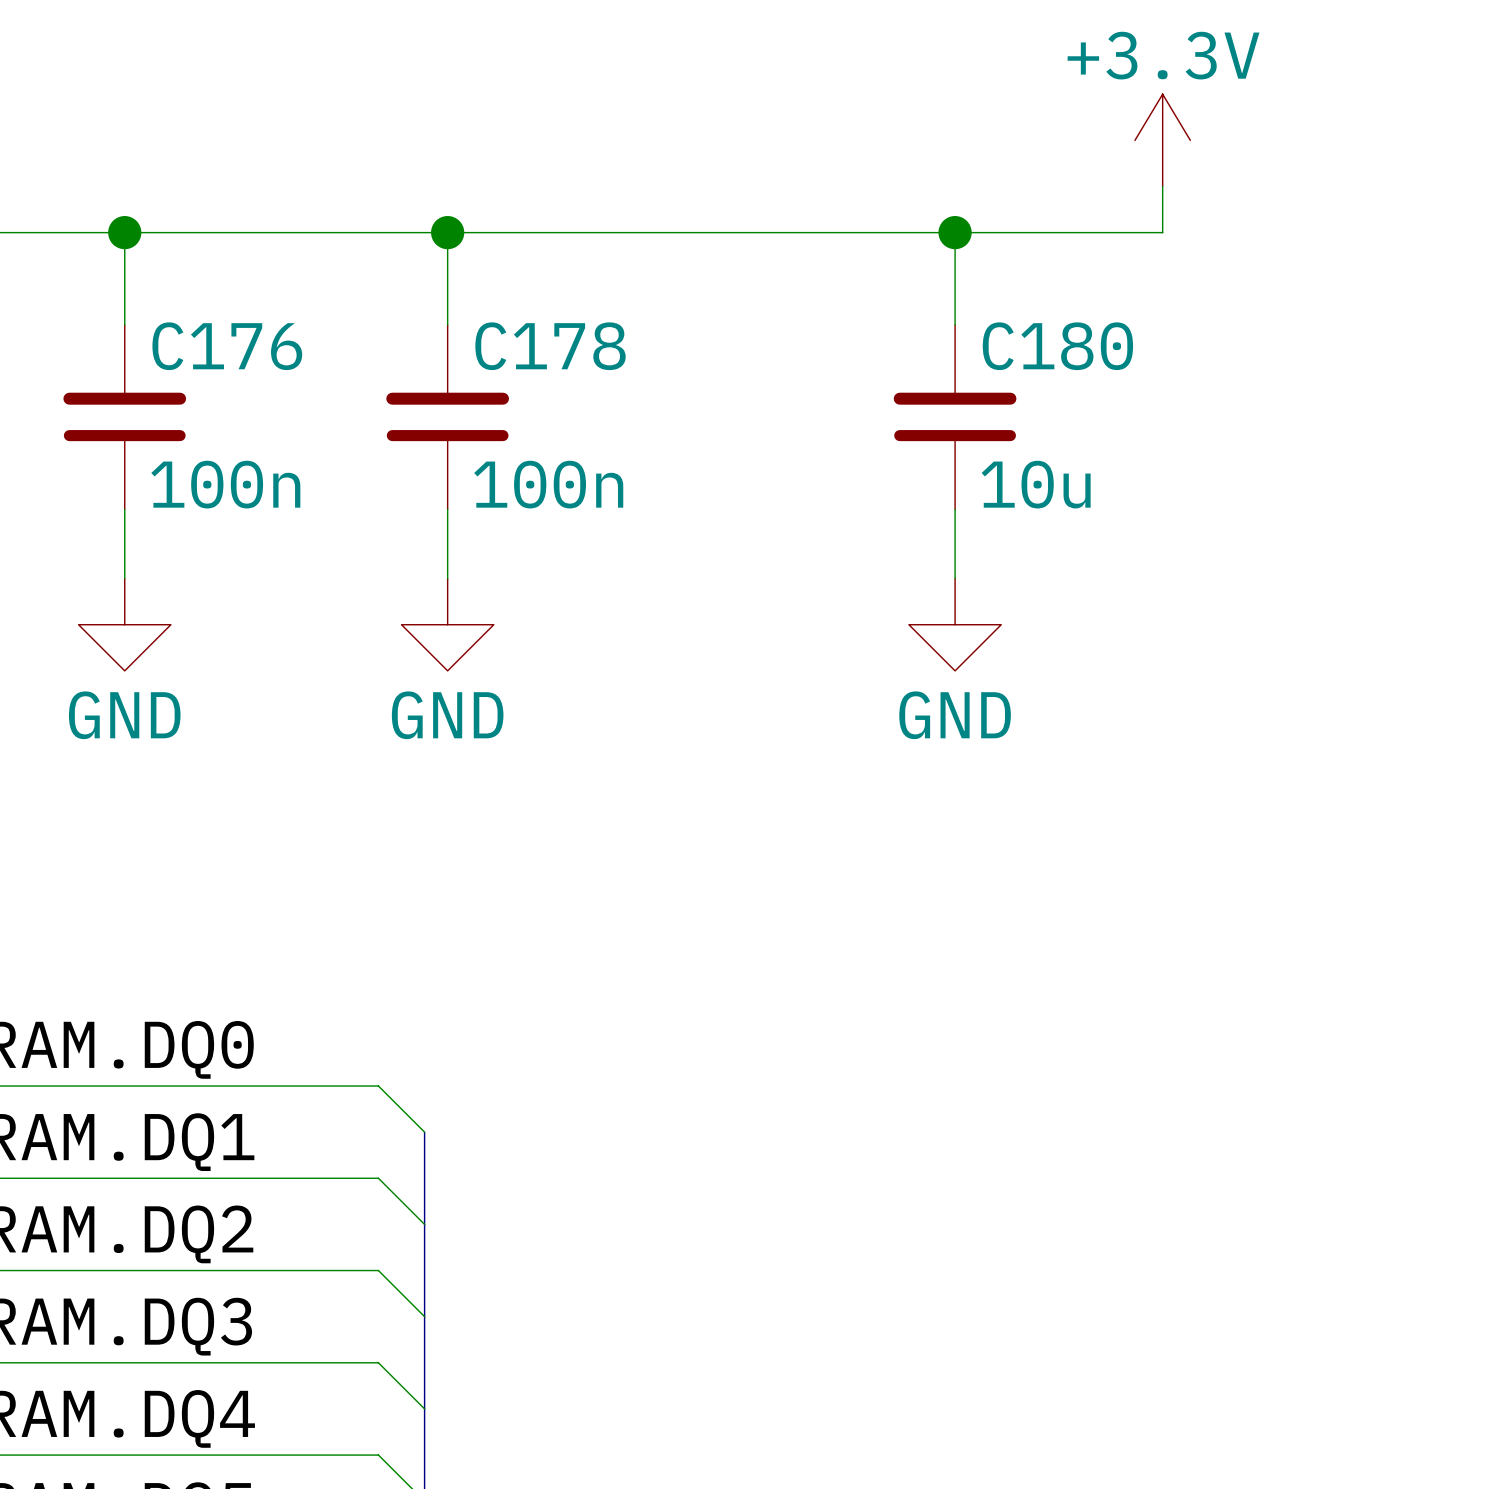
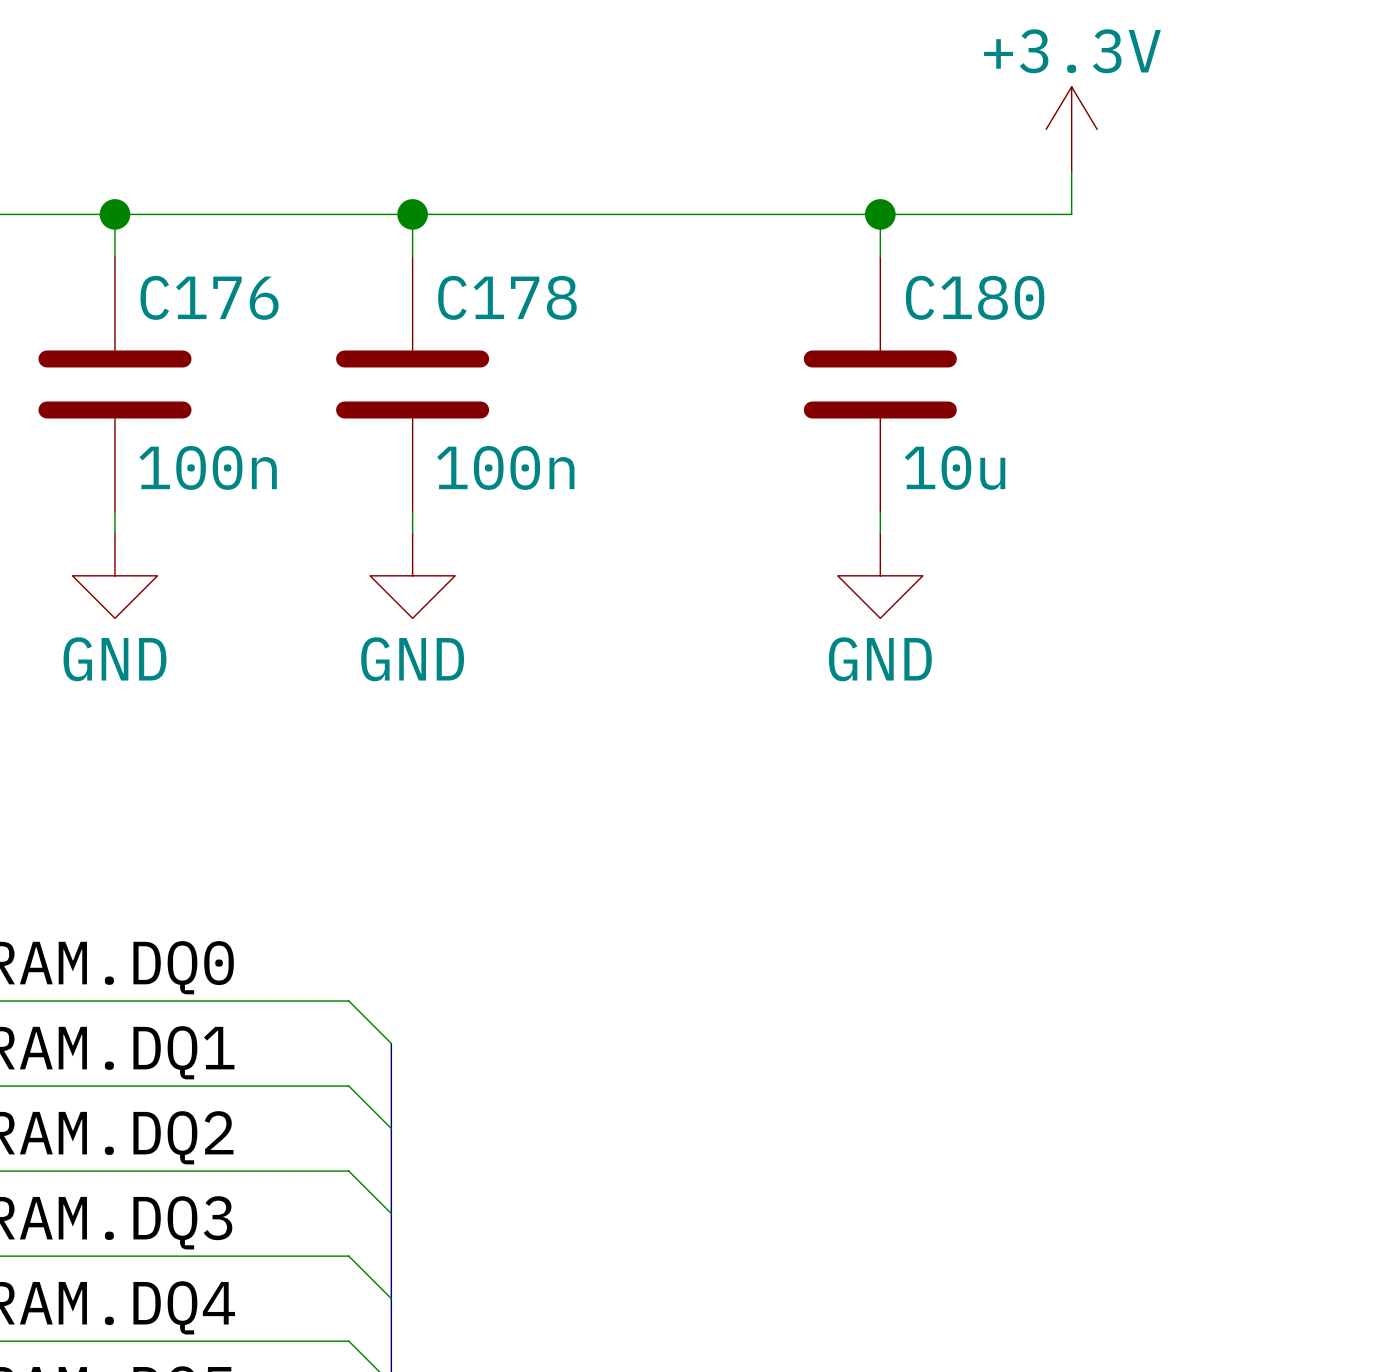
C176 symbol: [63, 324, 187, 510] -> [38, 256, 192, 513]
C178 symbol: [386, 324, 510, 510] -> [336, 256, 490, 513]
C180 symbol: [893, 324, 1017, 510] -> [803, 256, 957, 513]

